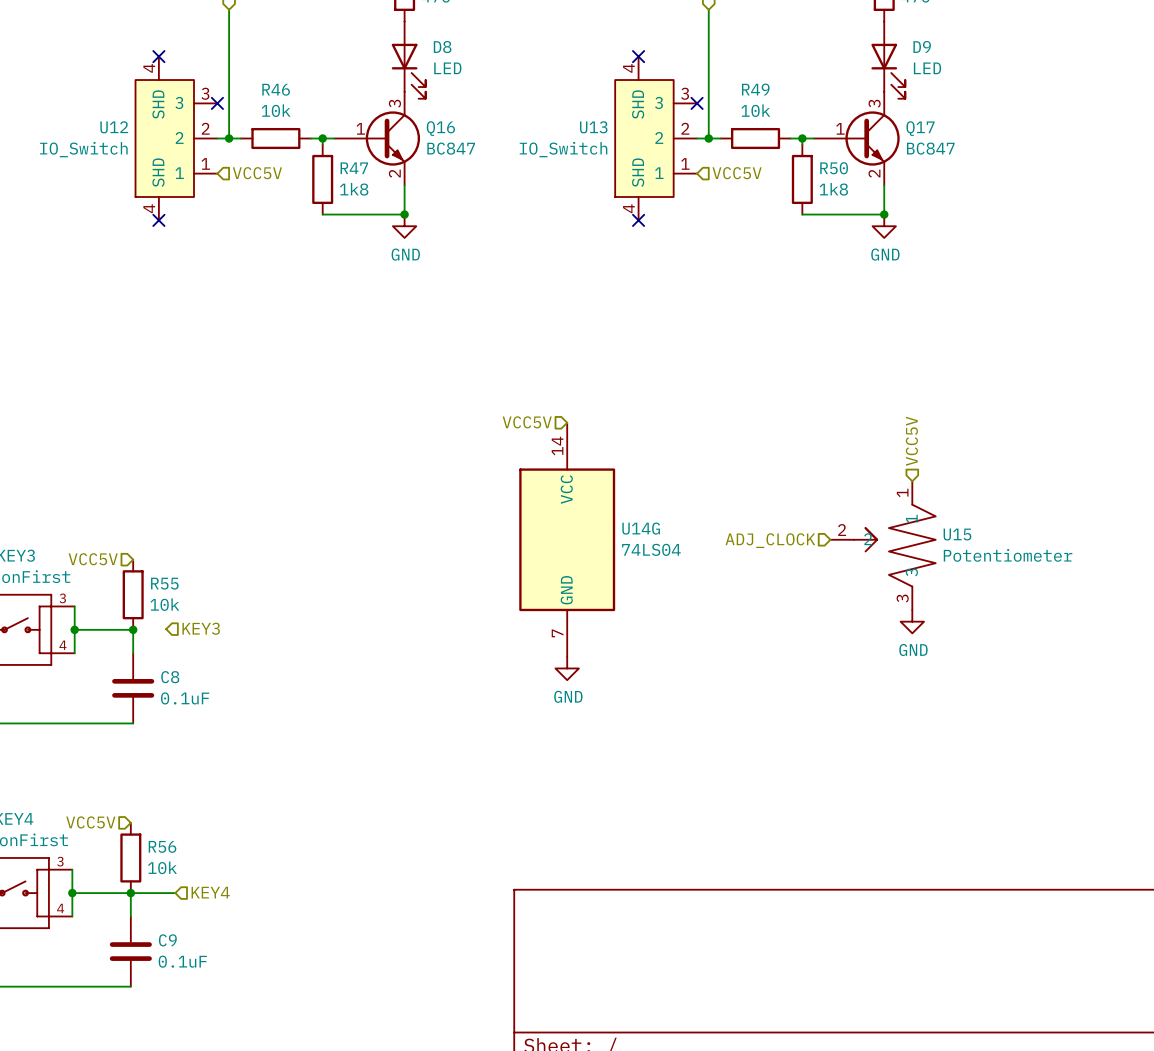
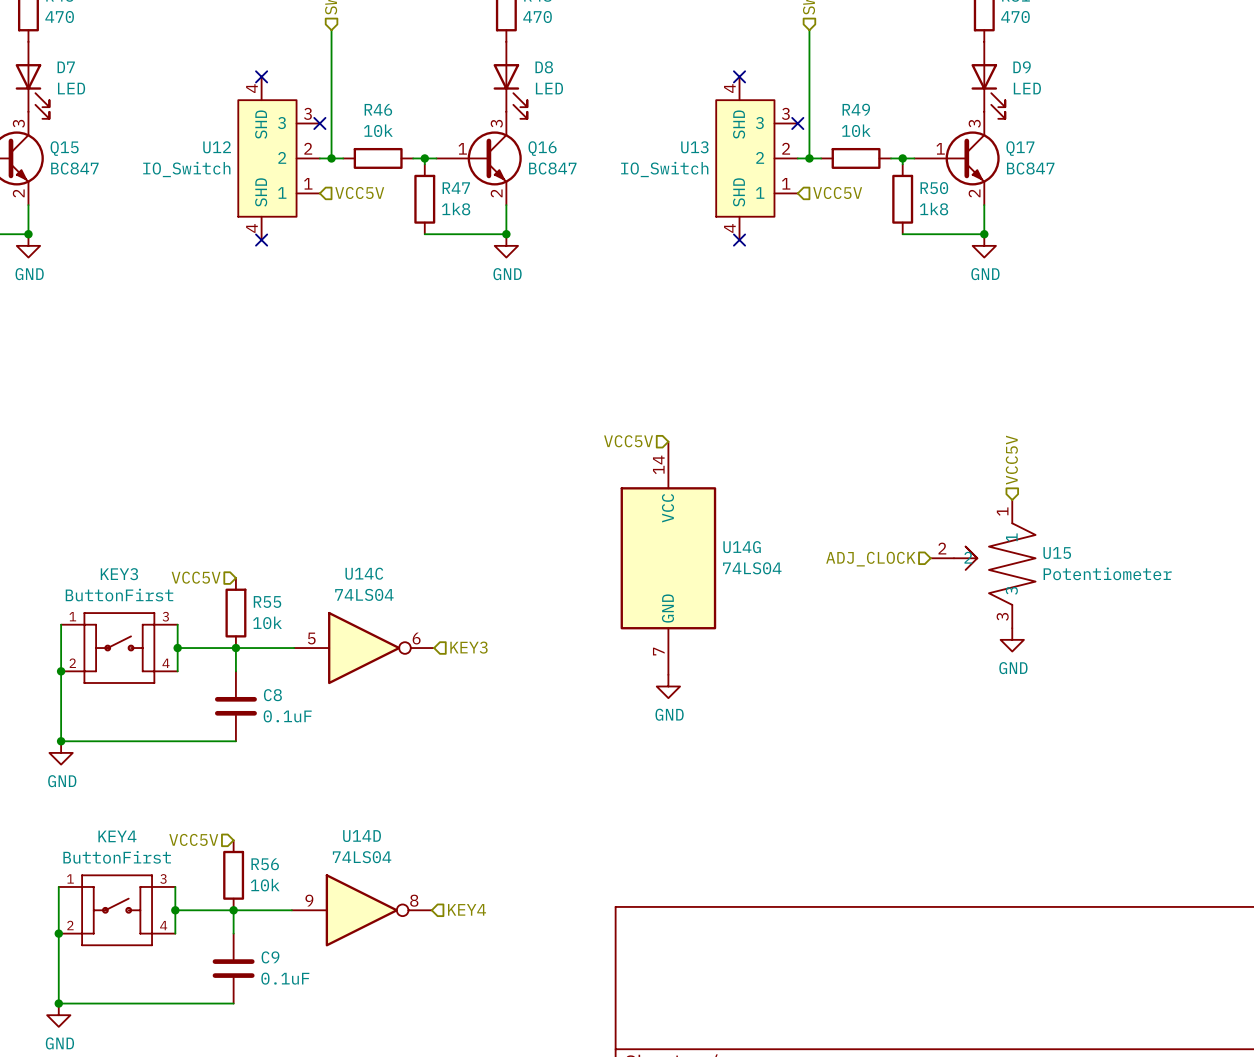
hierarchical label position: KEY3 (201, 628) -> KEY3 (468, 647)
wire: none -> (235, 648) (294, 648)
U14C: none -> 74LS04 (364, 648)
hierarchical label position: KEY4 (210, 892) -> KEY4 (467, 909)
wire: none -> (277, 910) (291, 910)
U14D: none -> 74LS04 (361, 910)

